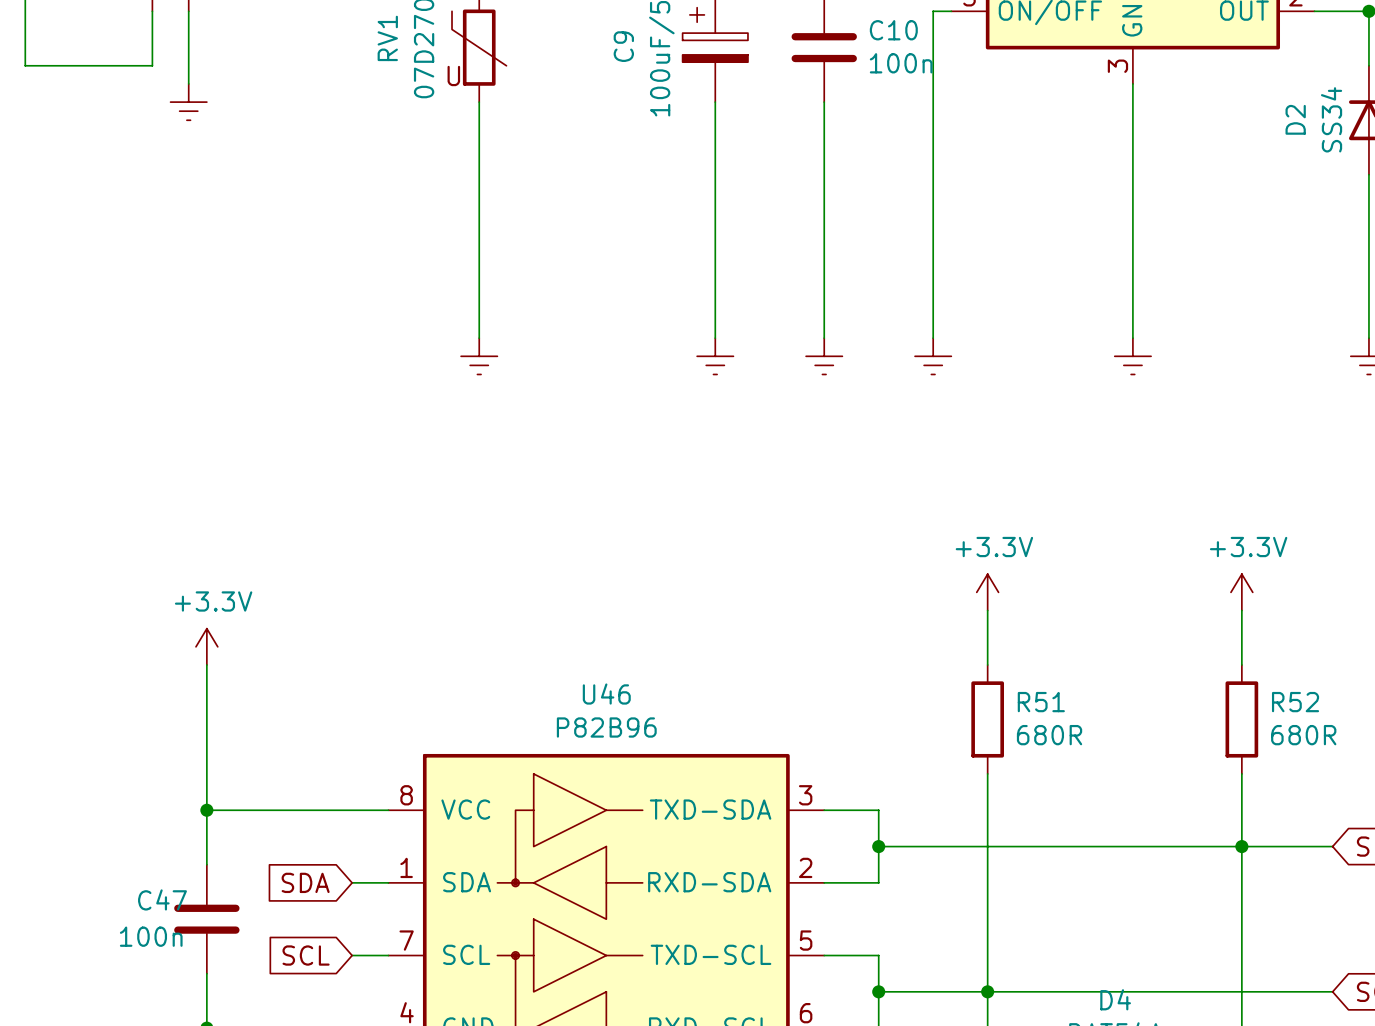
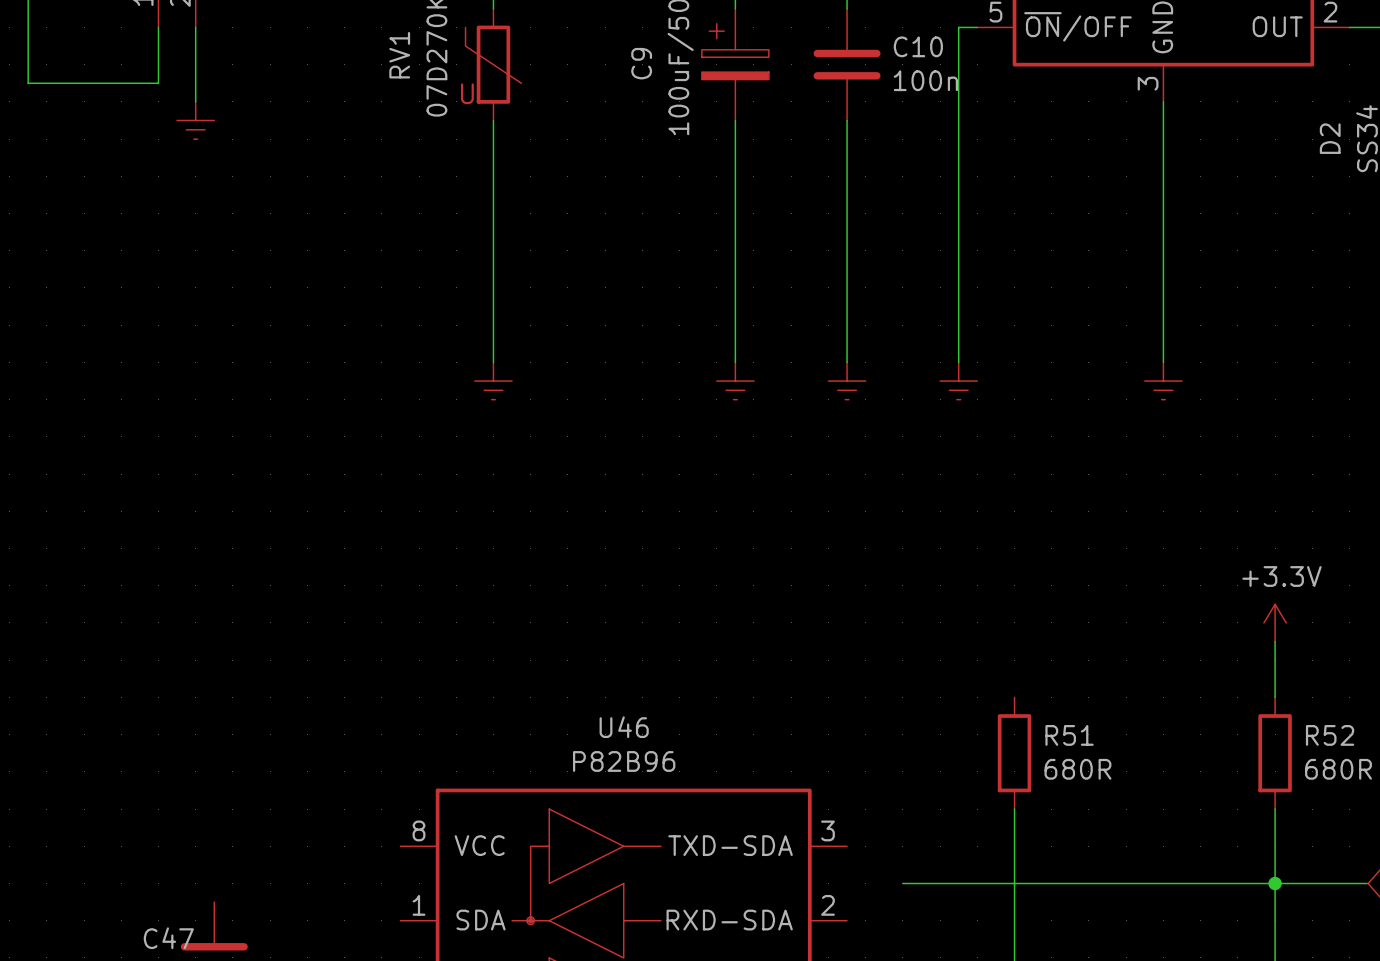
power symbol: +3.3V (987, 592) -> none
wire: (987, 610) (987, 664) -> none
power symbol: +3.3V (206, 646) -> none
wire: (206, 664) (206, 864) -> none
wire: (206, 810) (388, 810) -> none
junction: (206, 810) -> none
wire: (824, 810) (878, 810) (878, 882) (824, 882) -> none
junction: (878, 846) -> none
global label: SDA (305, 882) -> none
wire: (352, 882) (388, 882) -> none

